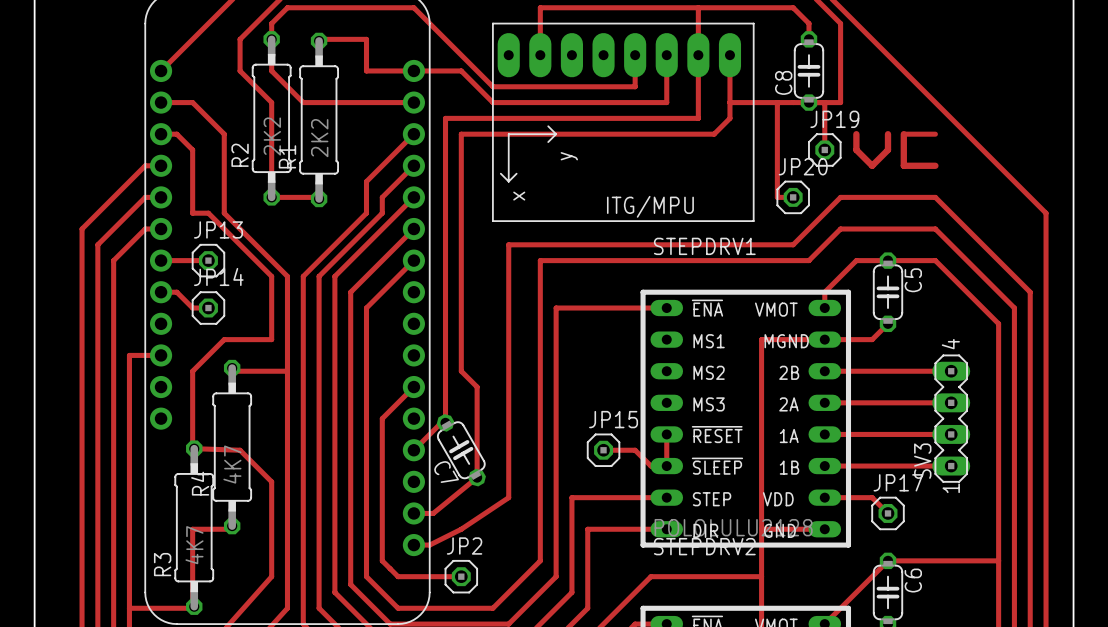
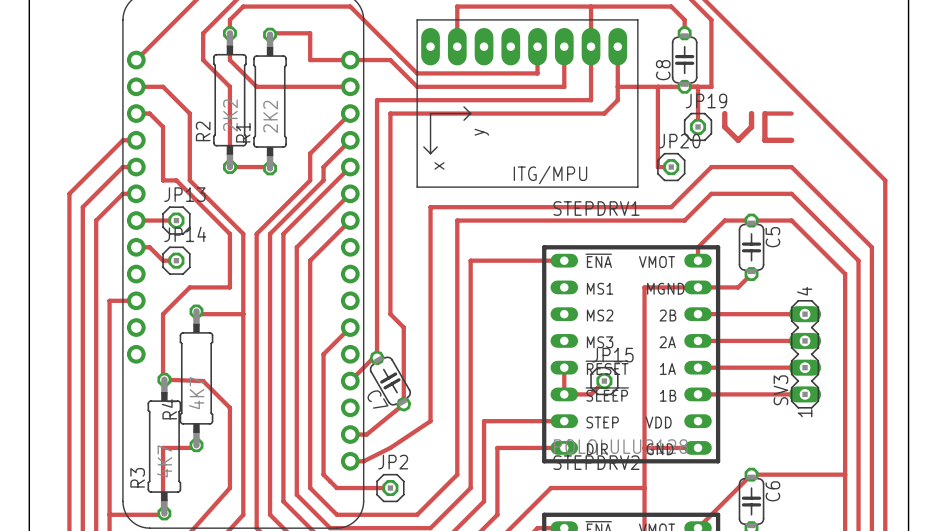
track: (603, 450) (635, 450) (650, 466) (666, 466) -> (604, 381) (591, 394) (564, 394)
JP15 position: (603, 450) -> (604, 381)
track: (824, 497) (872, 497) (888, 513) -> none
JP17: (888, 513) -> none

